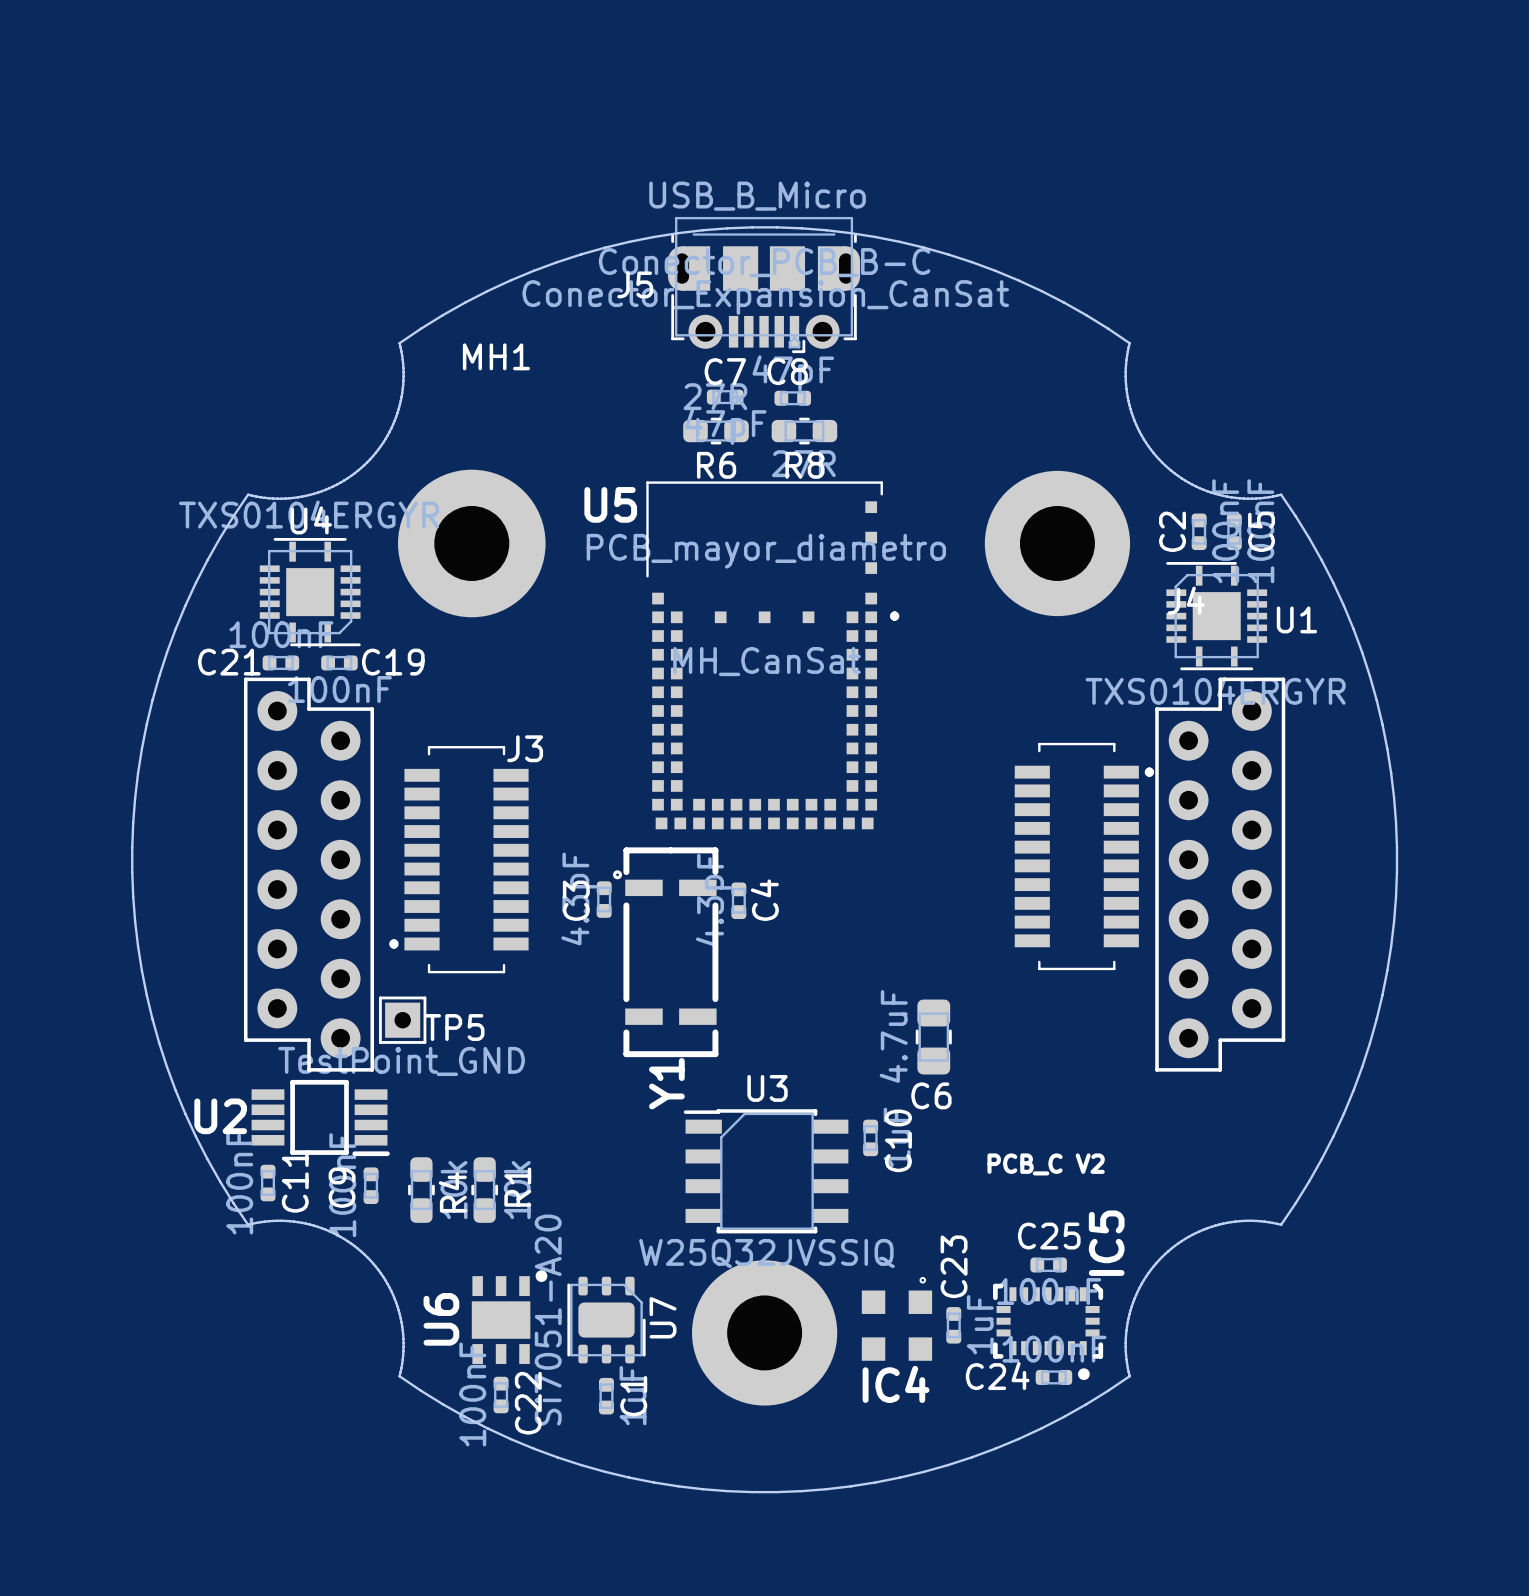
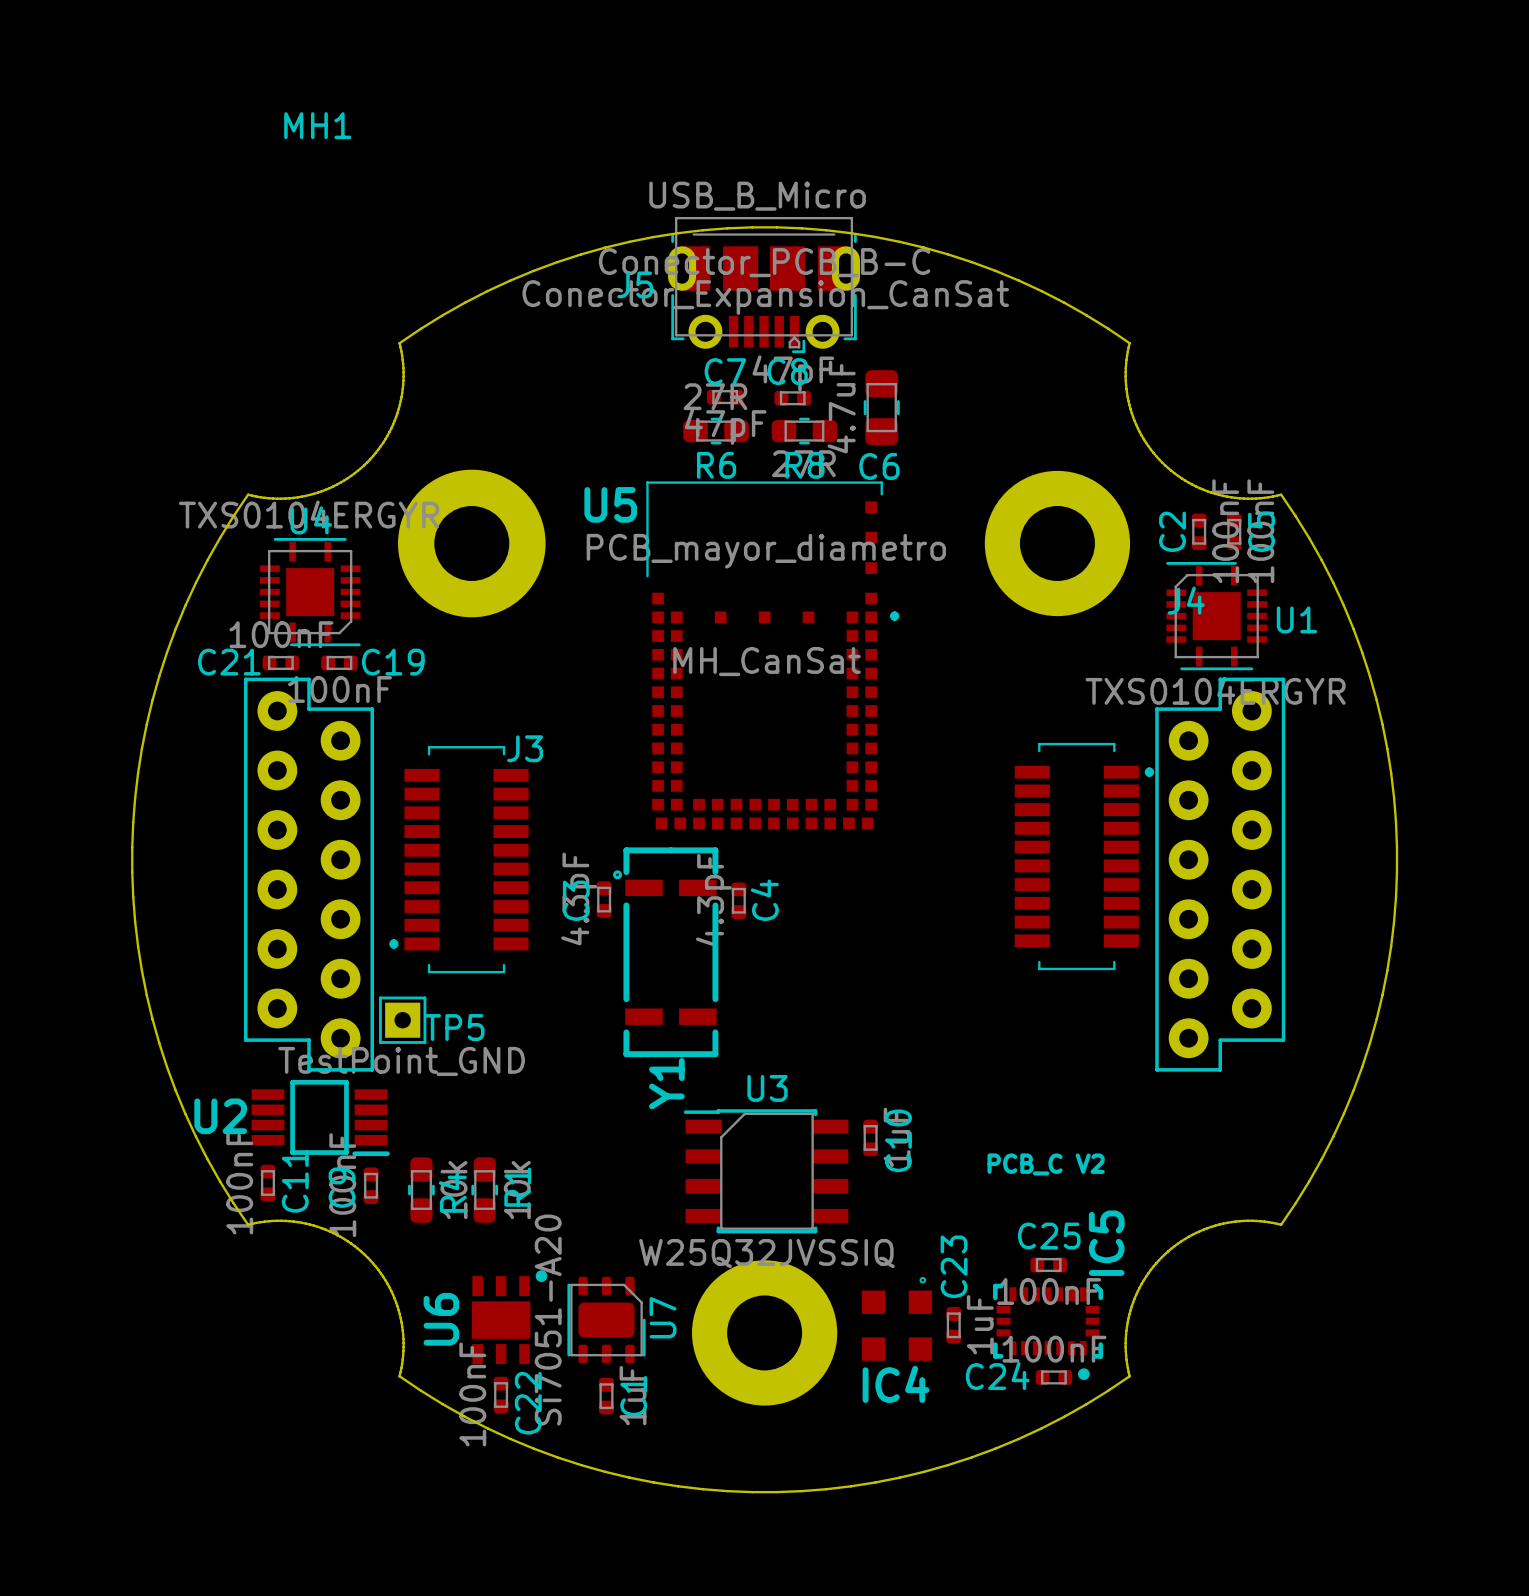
MH1 name position: MH1 (496, 356) -> MH1 (317, 125)
C6 position: (933, 1037) -> (881, 407)

